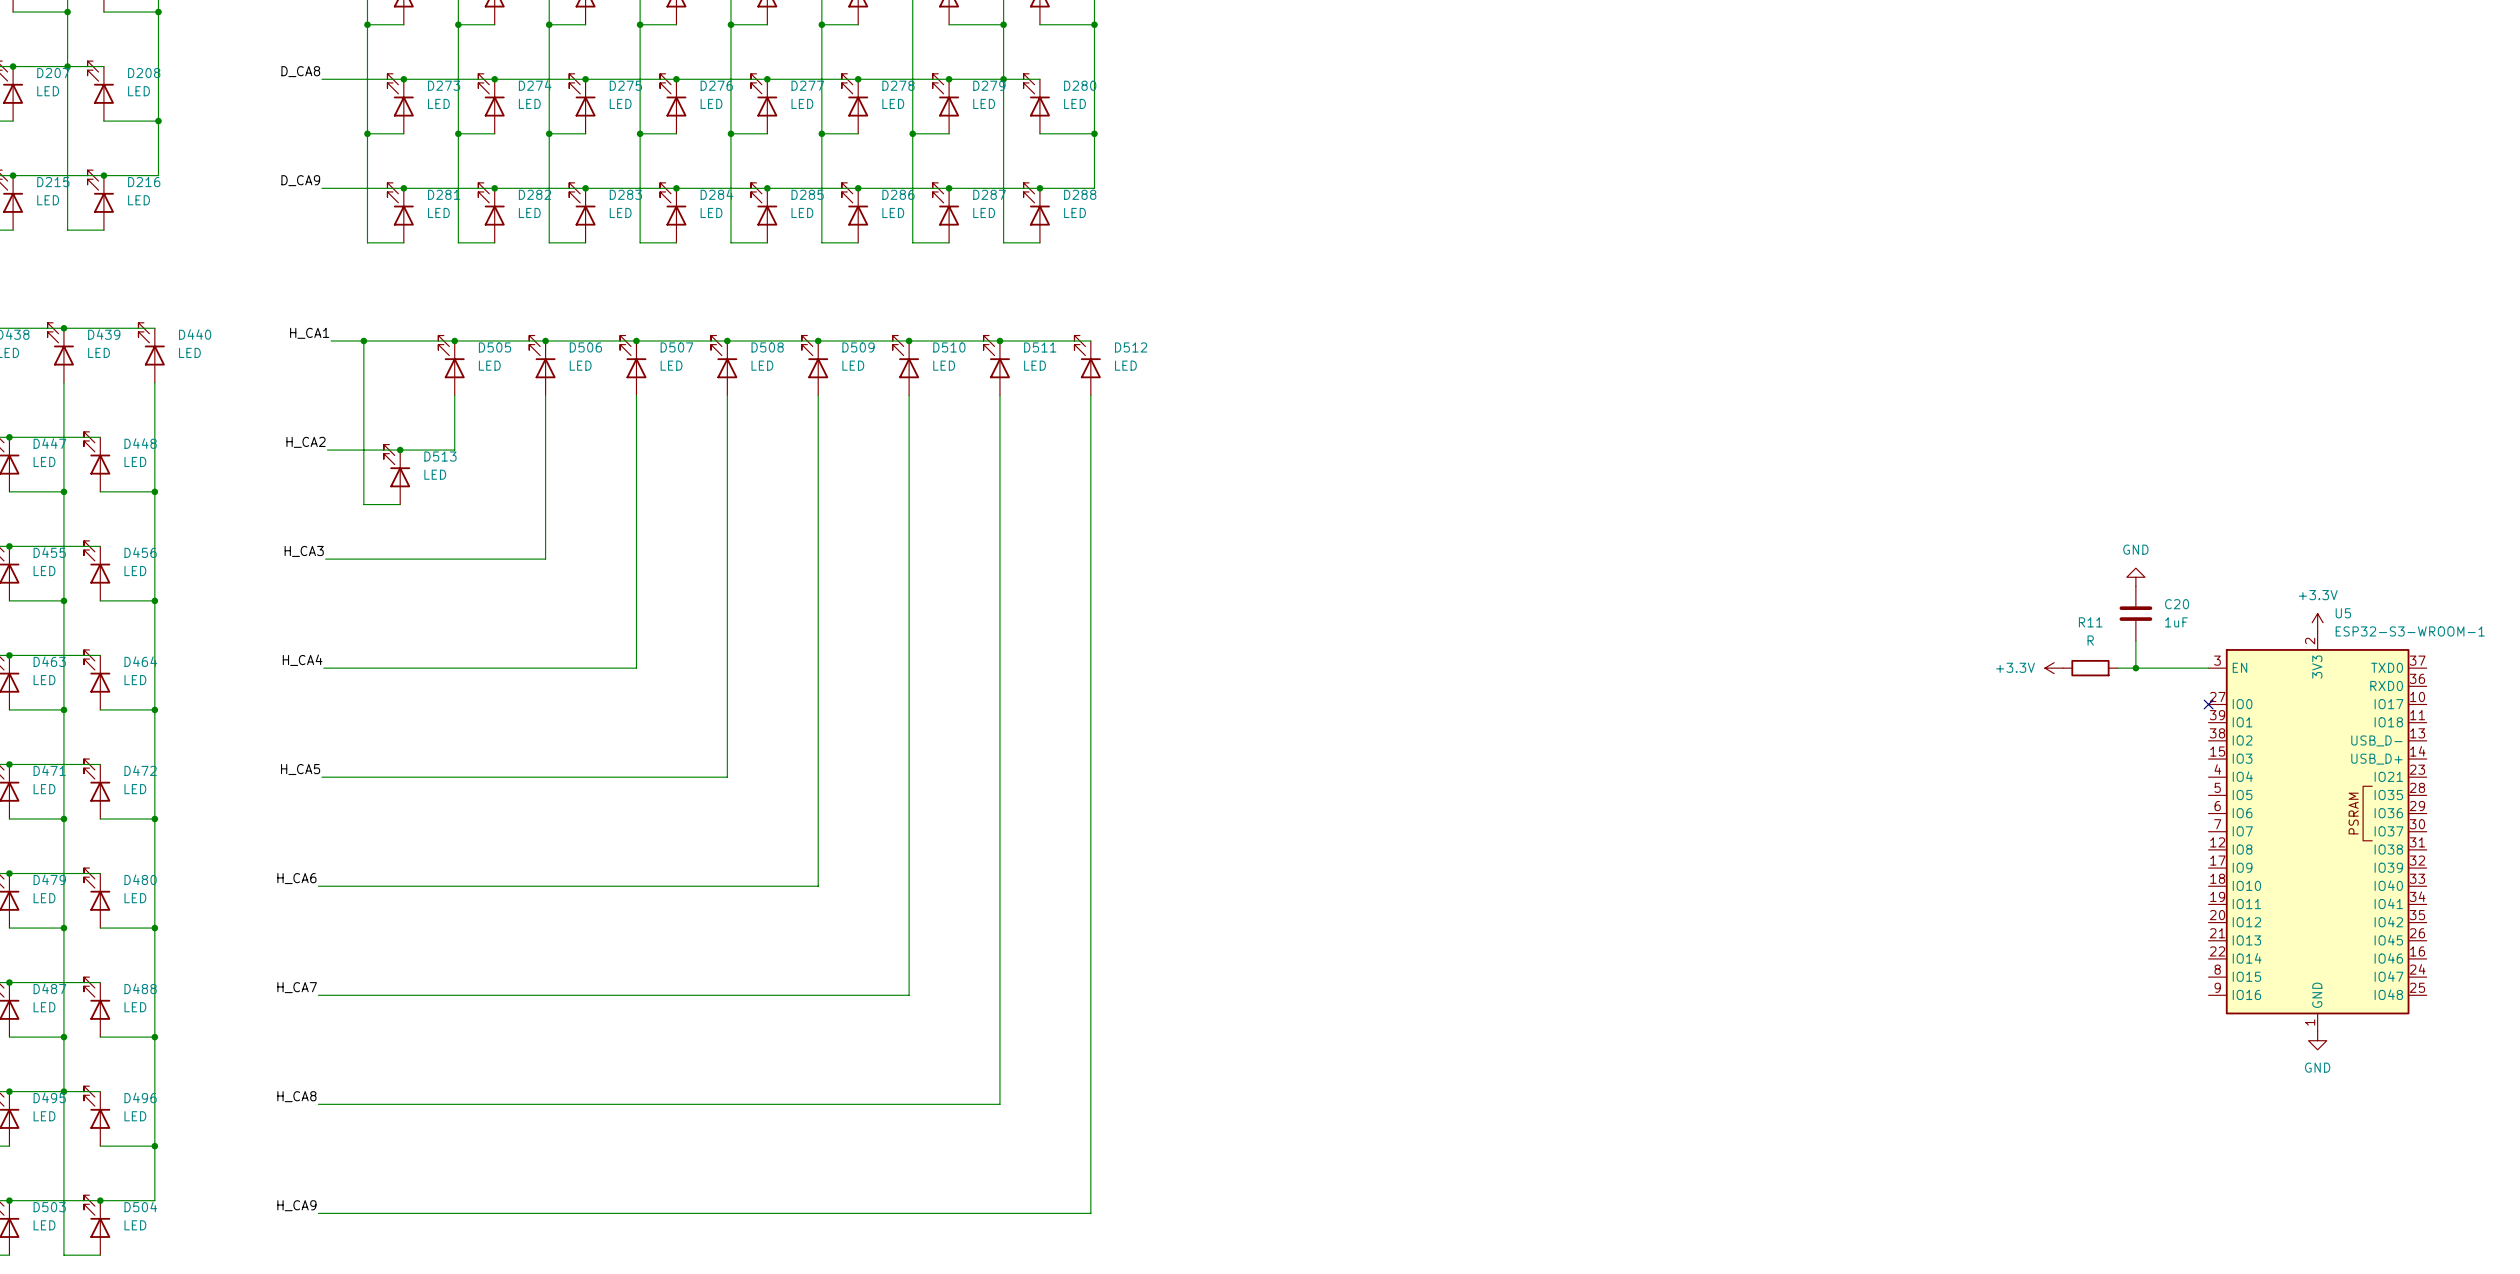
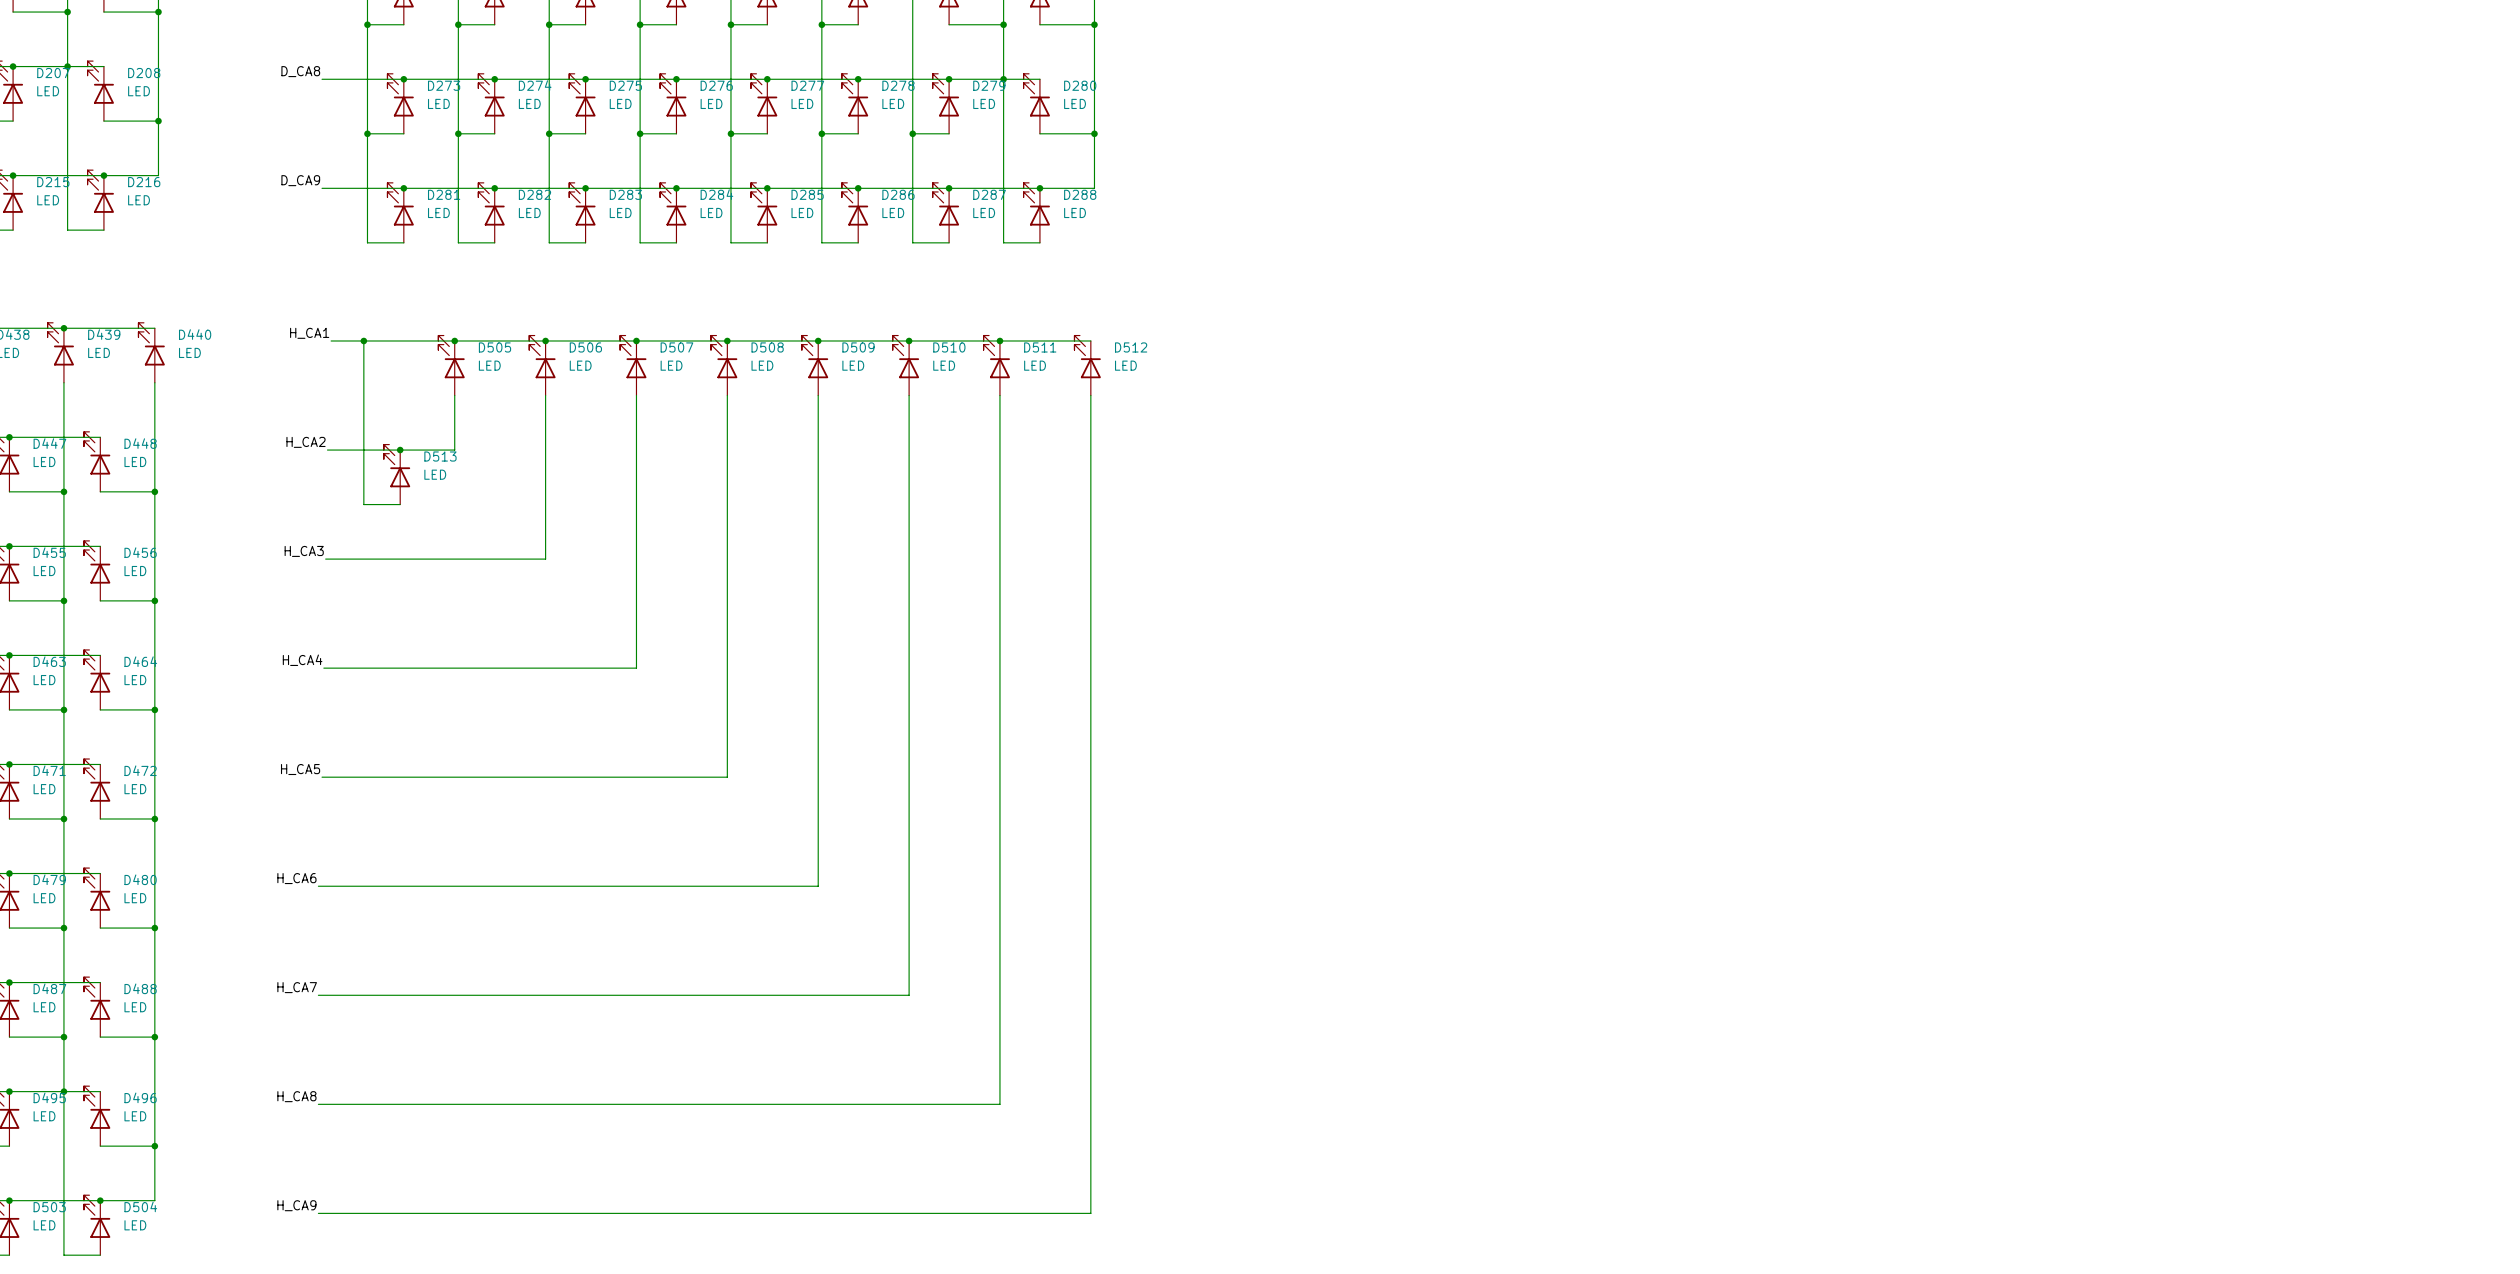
power symbol: GND (2135, 577) -> none
C20: 1uF (2135, 613) -> none
power symbol: +3.3V (2317, 622) -> none
wire: (2135, 640) (2135, 668) -> none
power symbol: +3.3V (2054, 668) -> none
R11: R (2090, 668) -> none
wire: (2117, 668) (2208, 668) -> none
junction: (2135, 668) -> none
no-connect mark: (2208, 704) -> none
U5: ESP32-S3-WROOM-1 (2317, 831) -> none
power symbol: GND (2317, 1040) -> none

